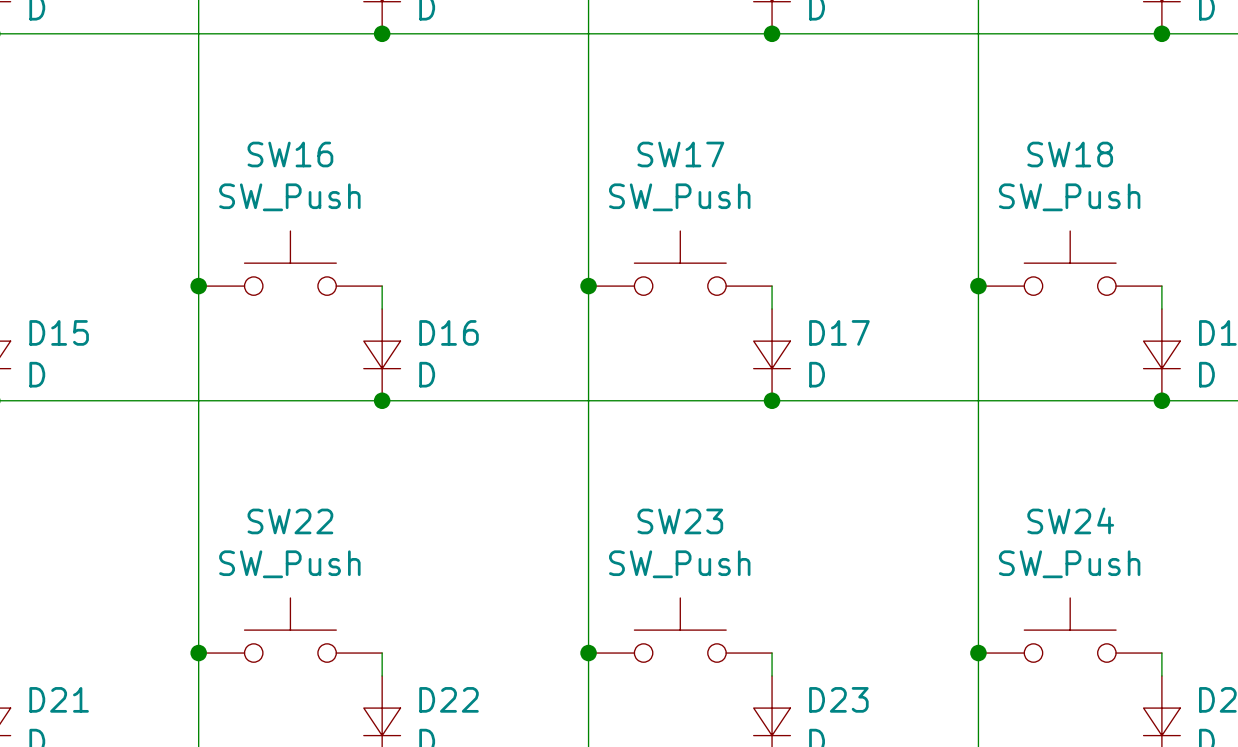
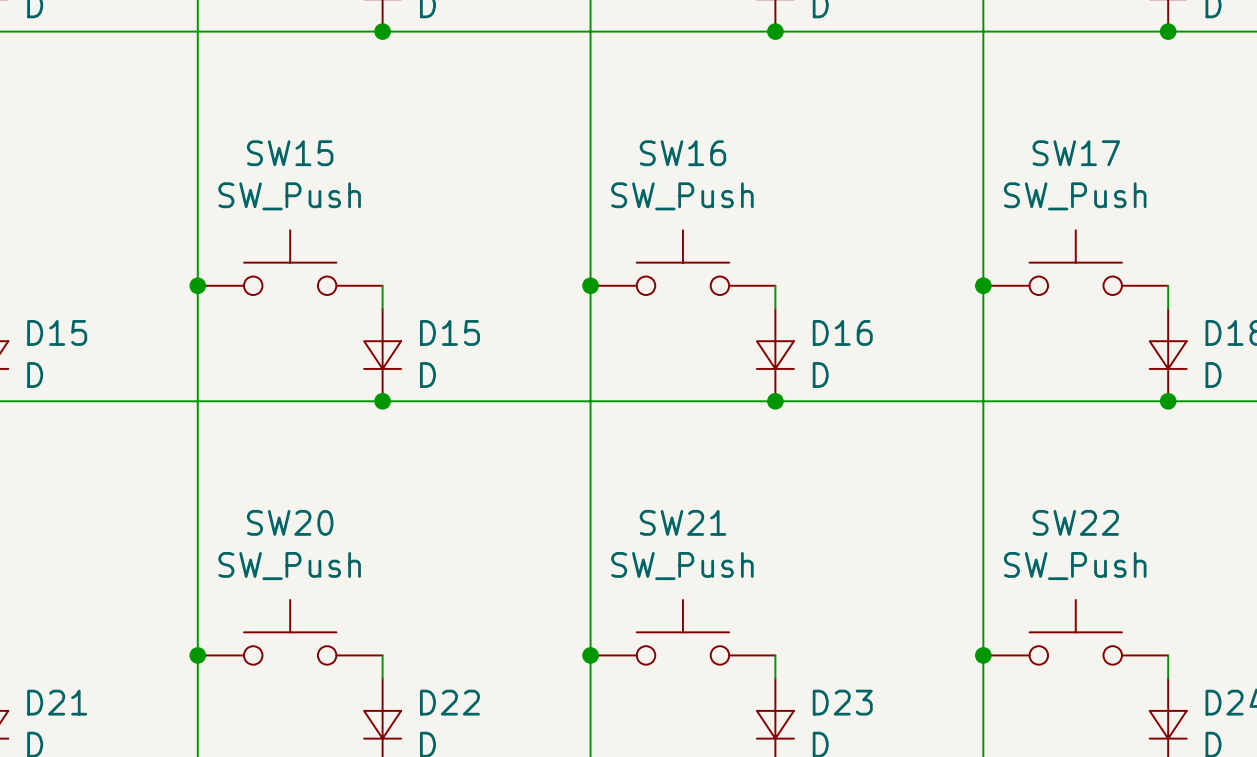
SW16 name: SW16 (290, 154) -> SW15 (290, 153)
SW17 name: SW17 (680, 154) -> SW16 (682, 153)
SW18 name: SW18 (1070, 154) -> SW17 (1076, 153)
D16 name: D16 (449, 332) -> D15 (449, 332)
D17 name: D17 (839, 332) -> D16 (842, 332)
SW24 name: SW24 (1070, 520) -> SW22 (1075, 522)
SW22 name: SW22 (290, 521) -> SW20 (290, 522)
SW23 name: SW23 (680, 521) -> SW21 (682, 522)

